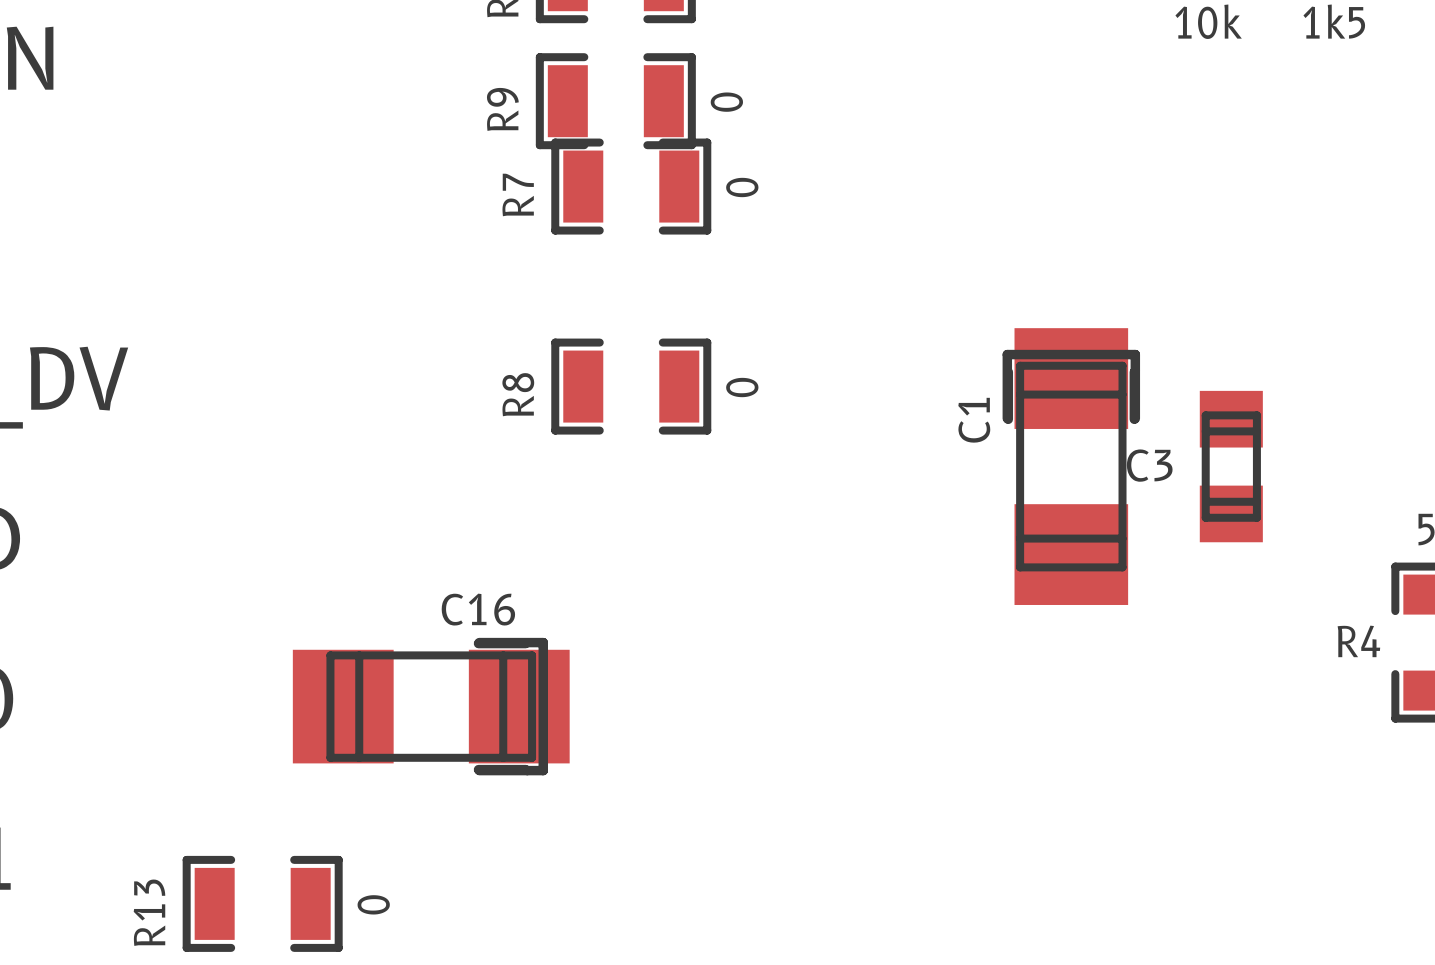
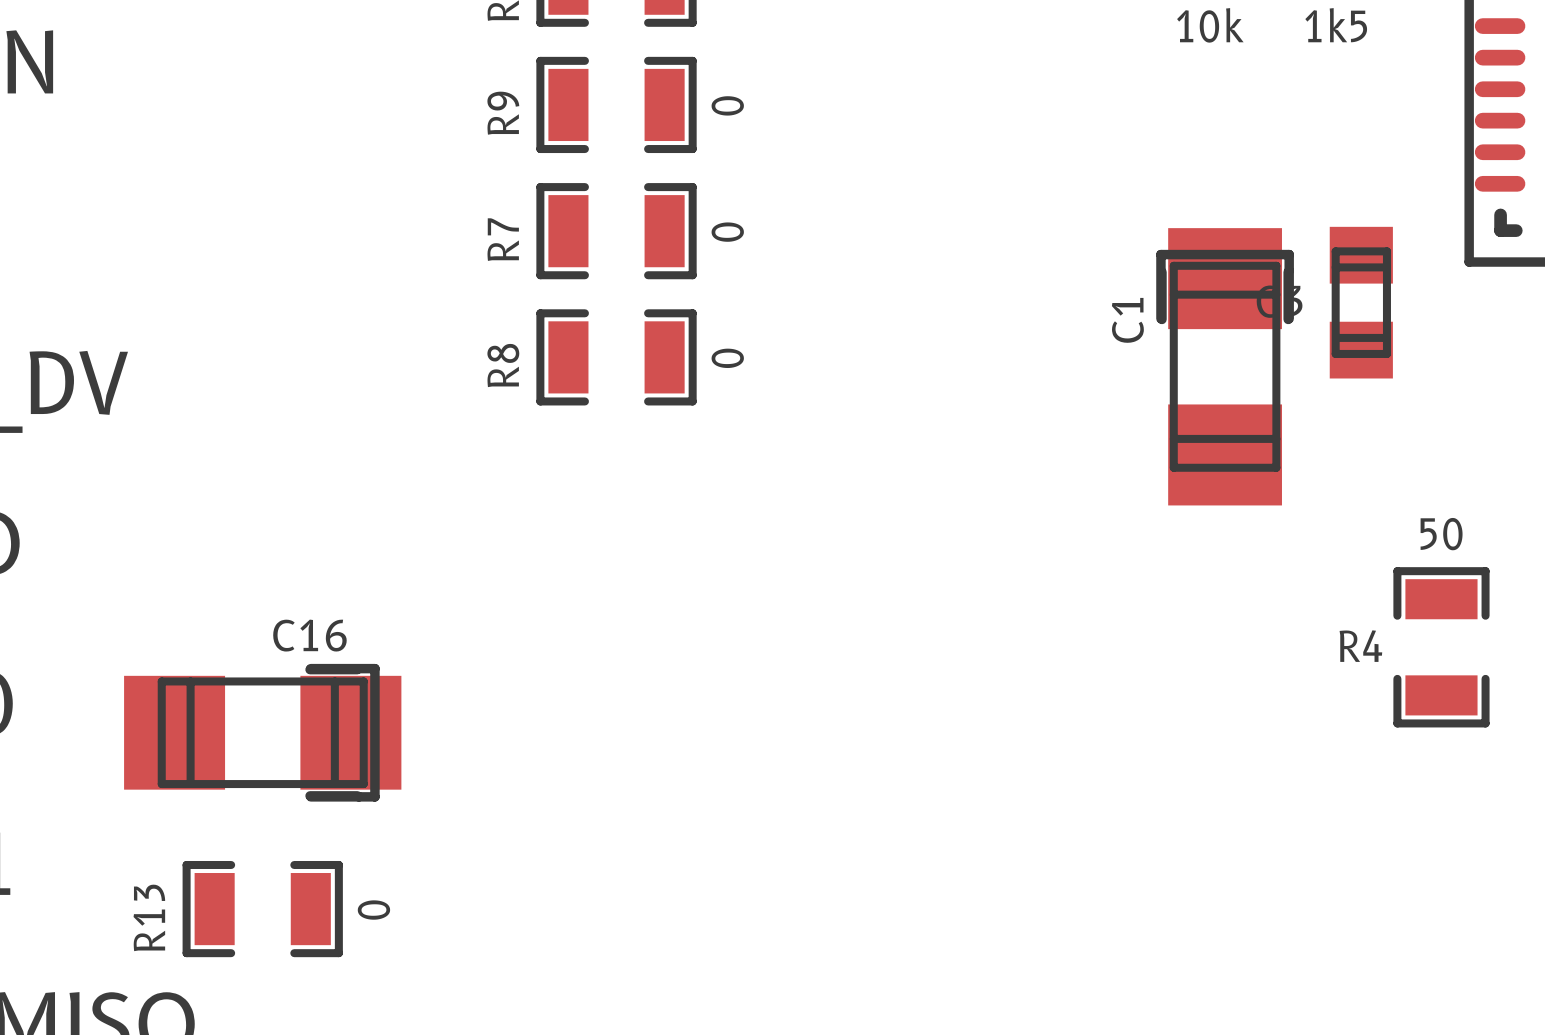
R7 position: (631, 186) -> (616, 231)
R8 position: (631, 386) -> (616, 357)
C1 position: (1071, 466) -> (1225, 366)
C3 position: (1231, 466) -> (1361, 302)
C16 position: (431, 706) -> (262, 732)

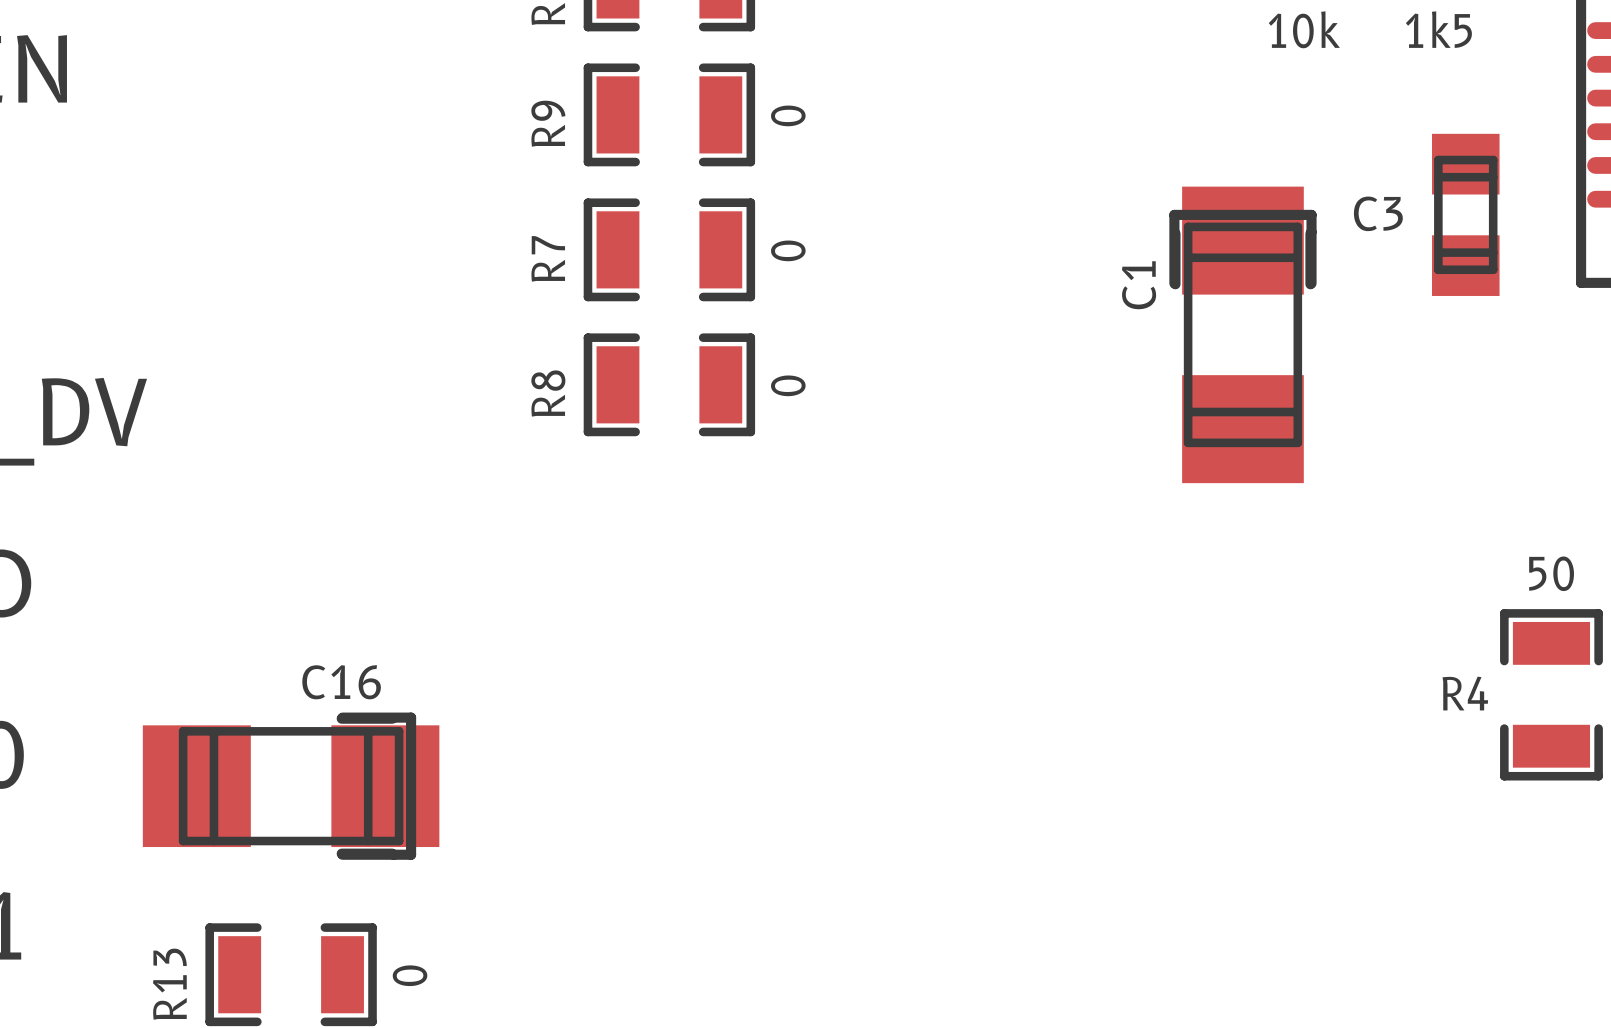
C3 position: (1361, 302) -> (1465, 214)
C1 position: (1225, 366) -> (1242, 334)

